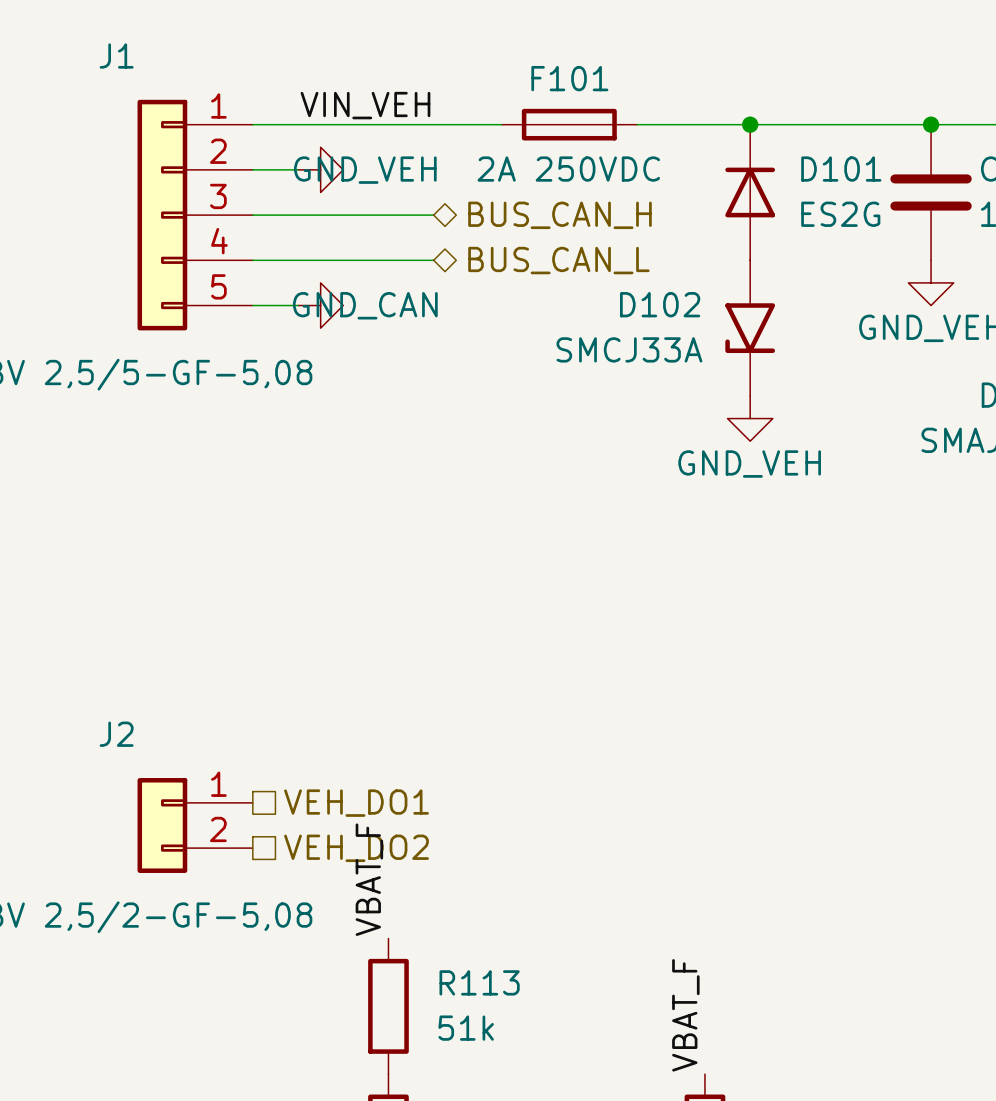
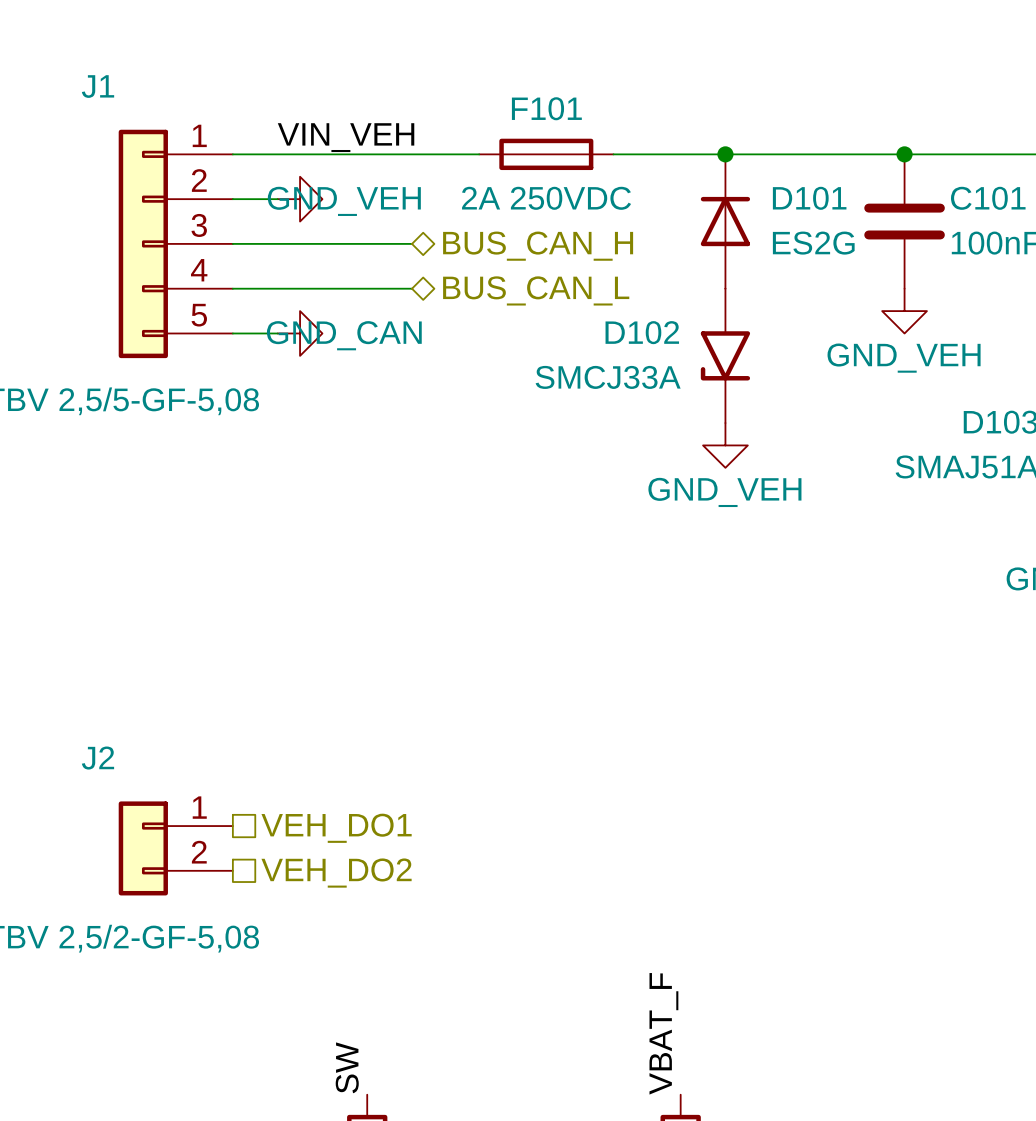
label: VBAT_F (369, 879) -> none
R113: 51k (388, 1006) -> none
label: none -> SW (347, 1067)

